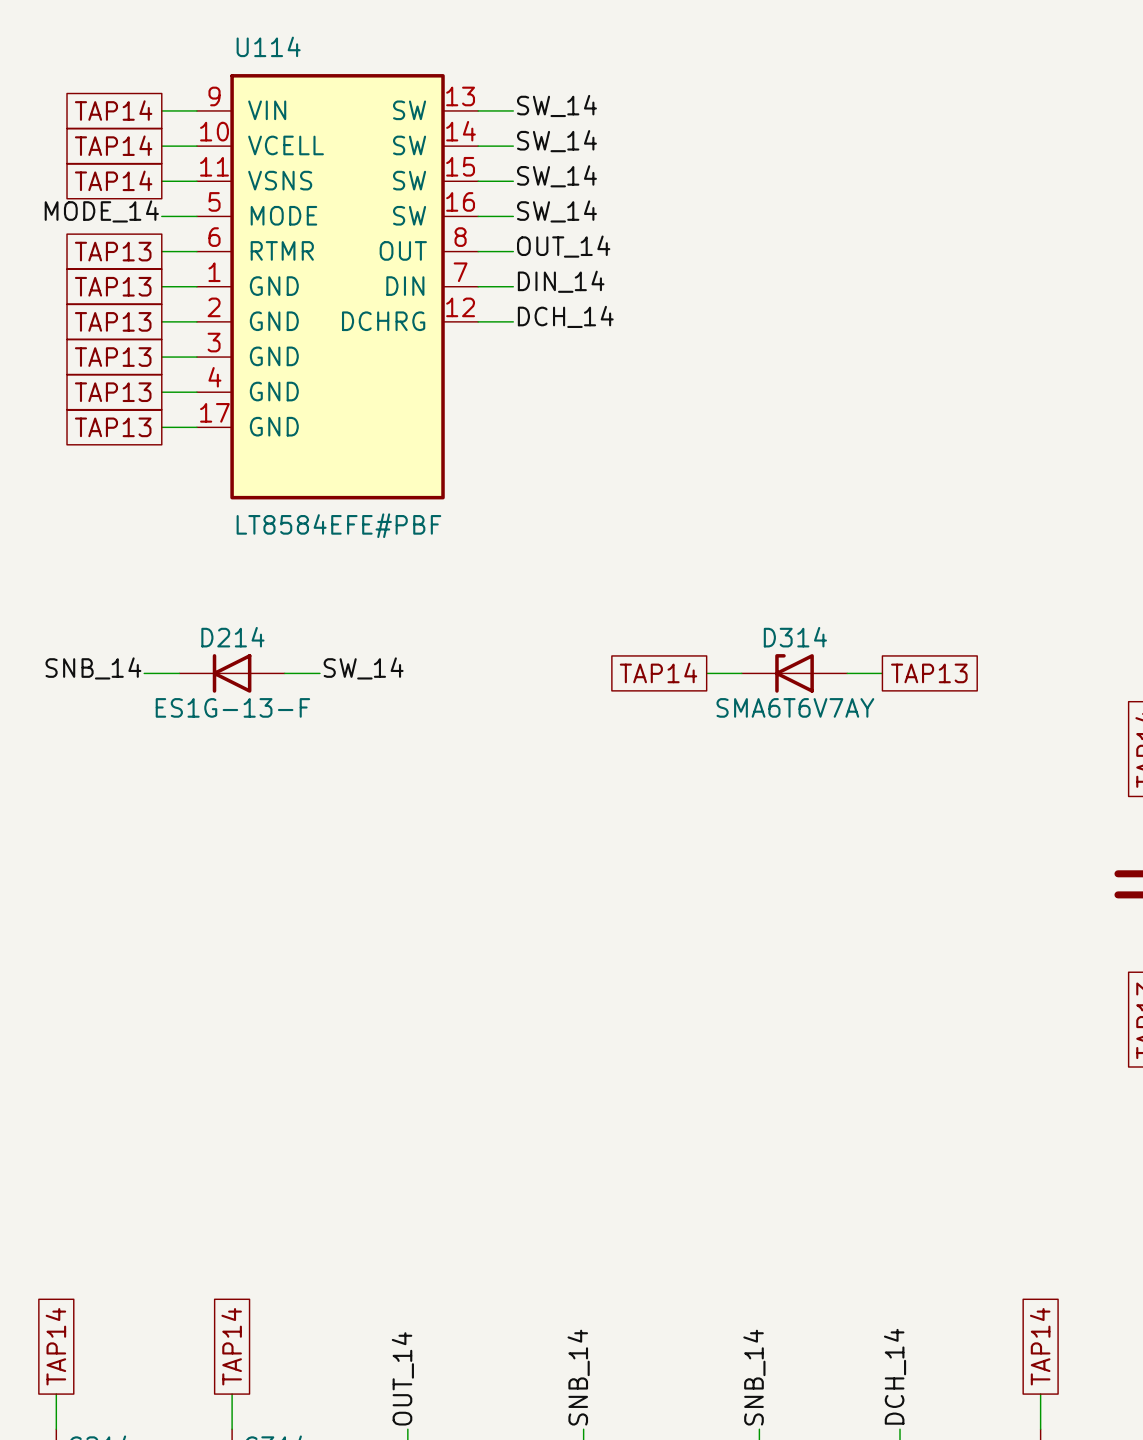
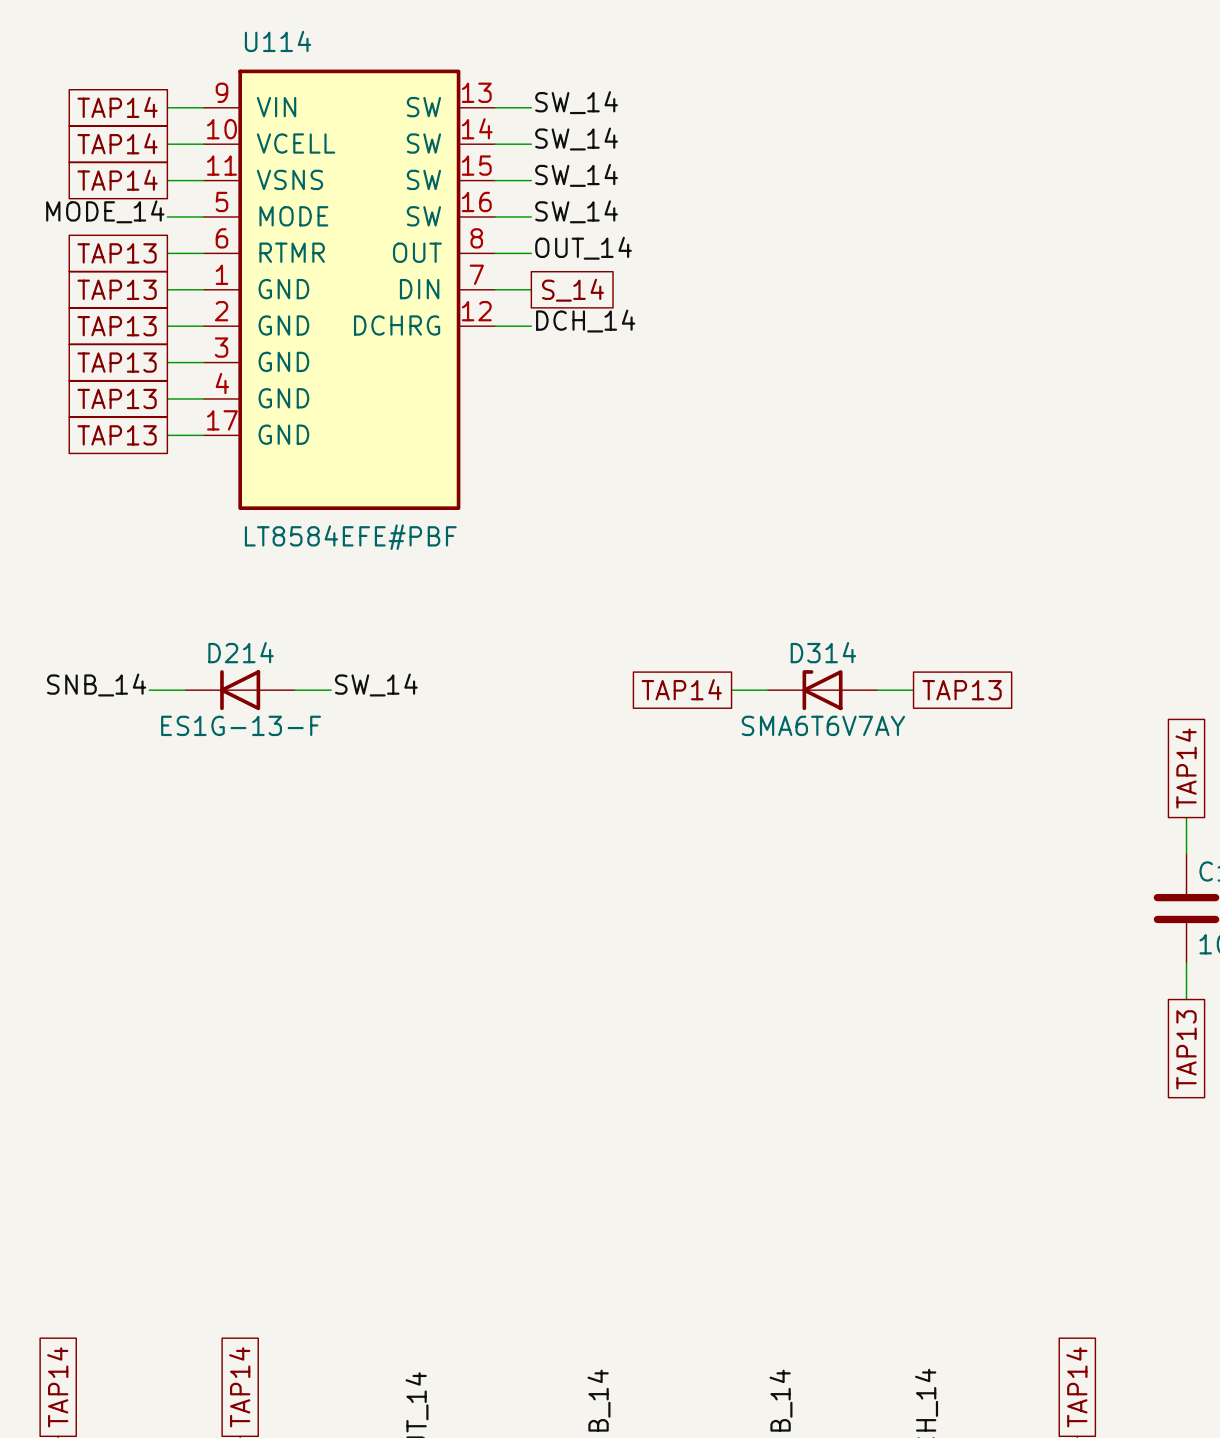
label: DIN_14 (561, 281) -> none
global label: none -> S_14 (572, 290)

